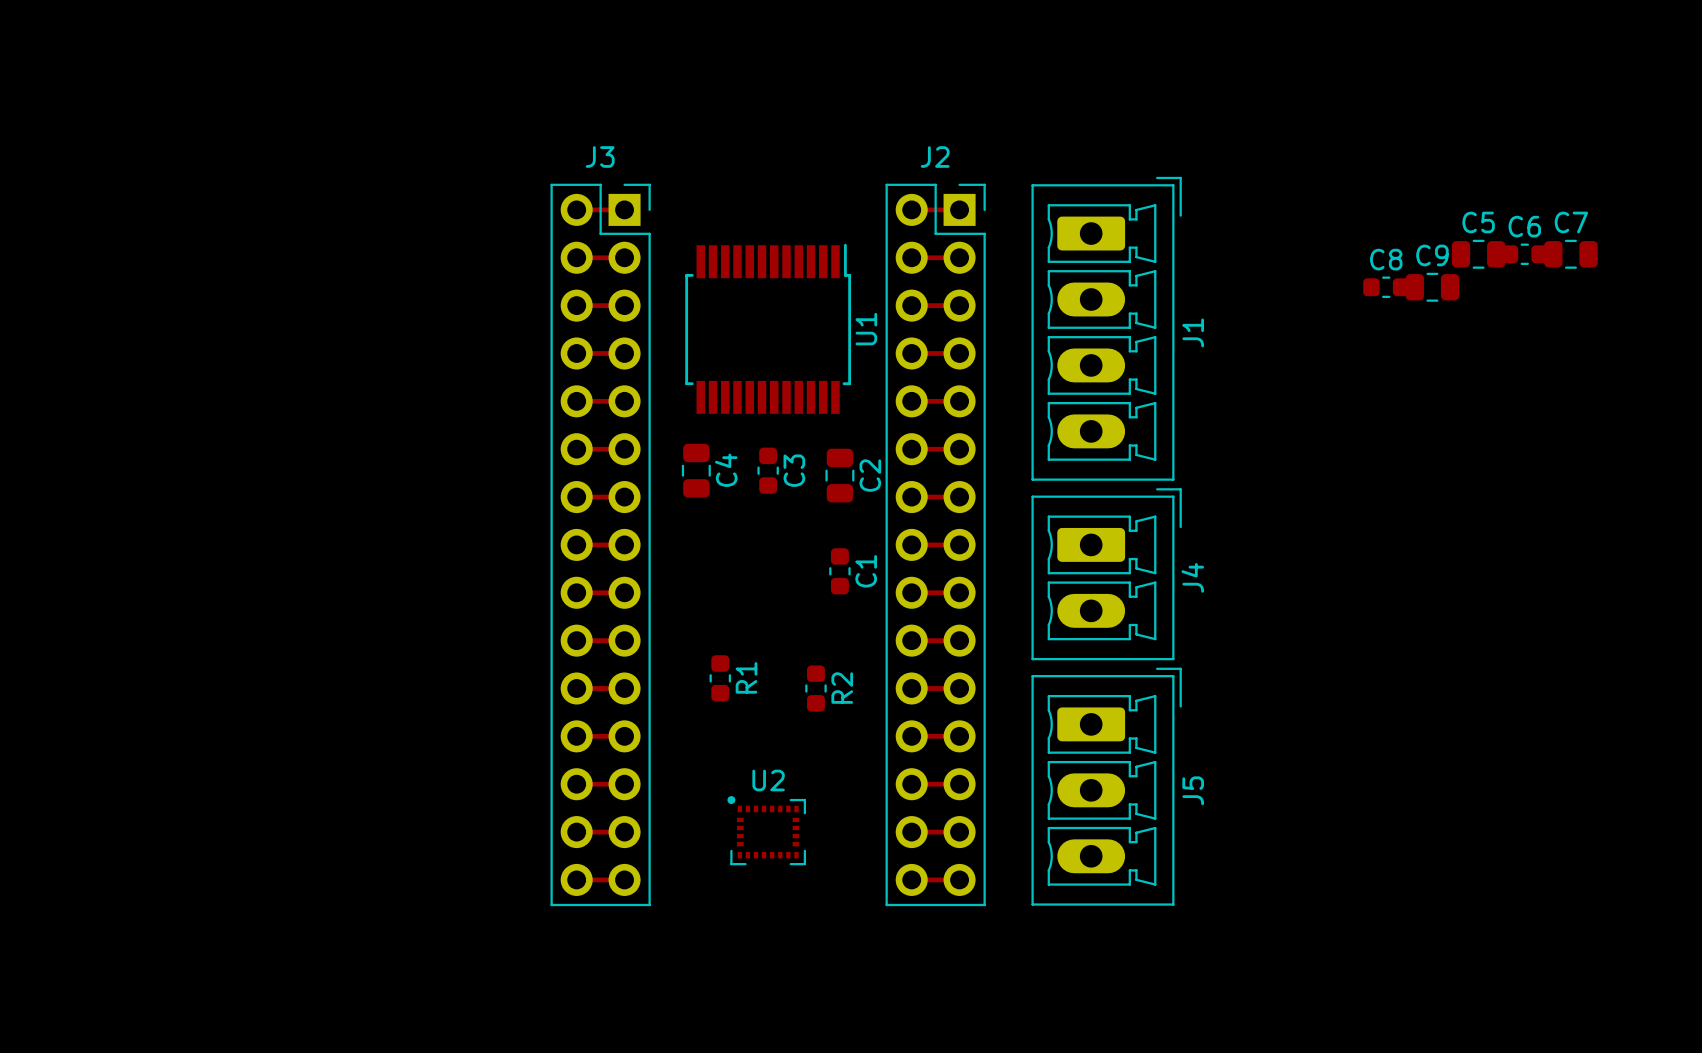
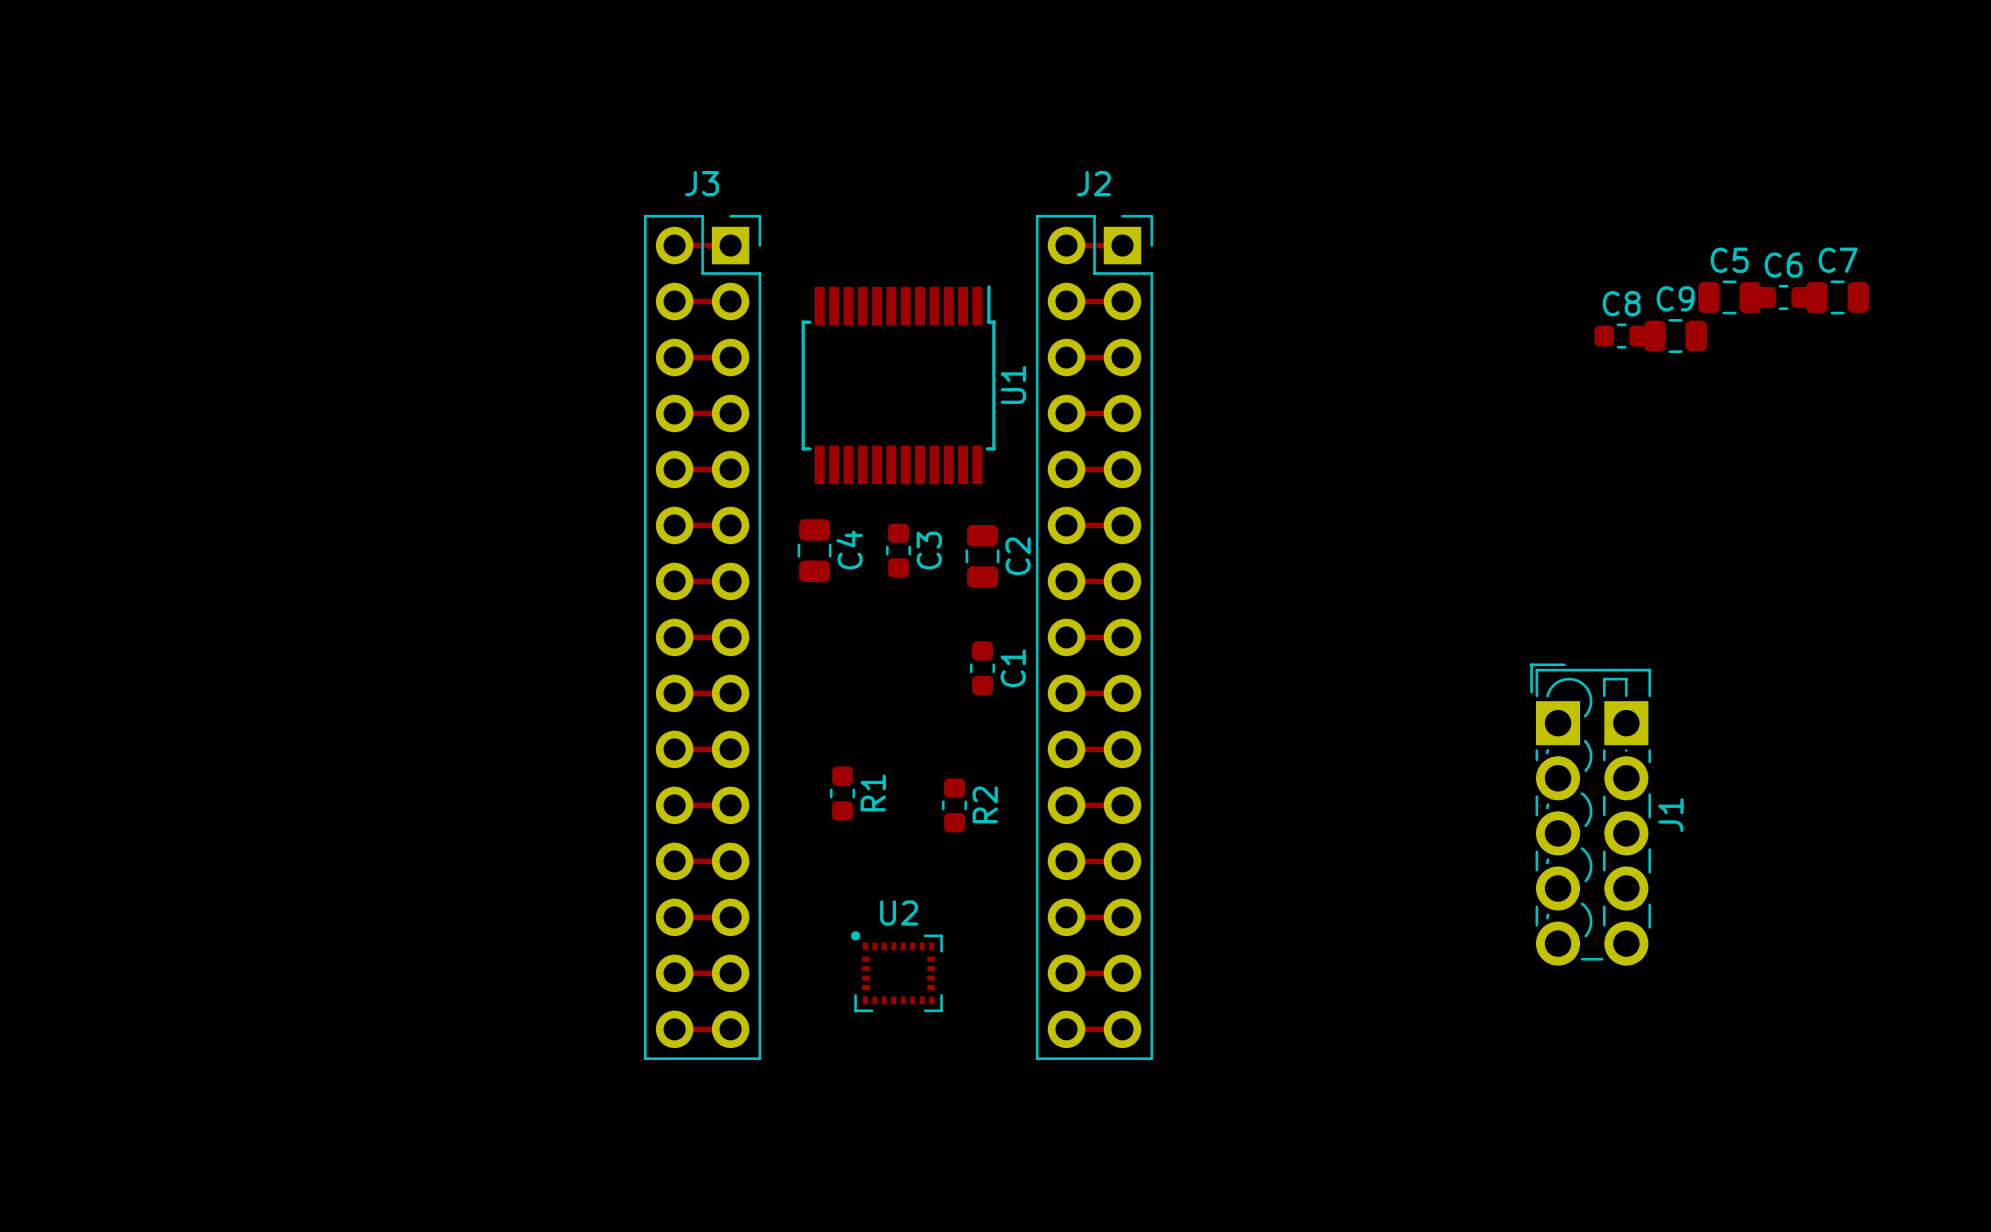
J1 footprint: [1031, 176, 1182, 481] -> [1530, 663, 1652, 966]
J4: (1106, 574) -> none
J5: (1106, 786) -> none

